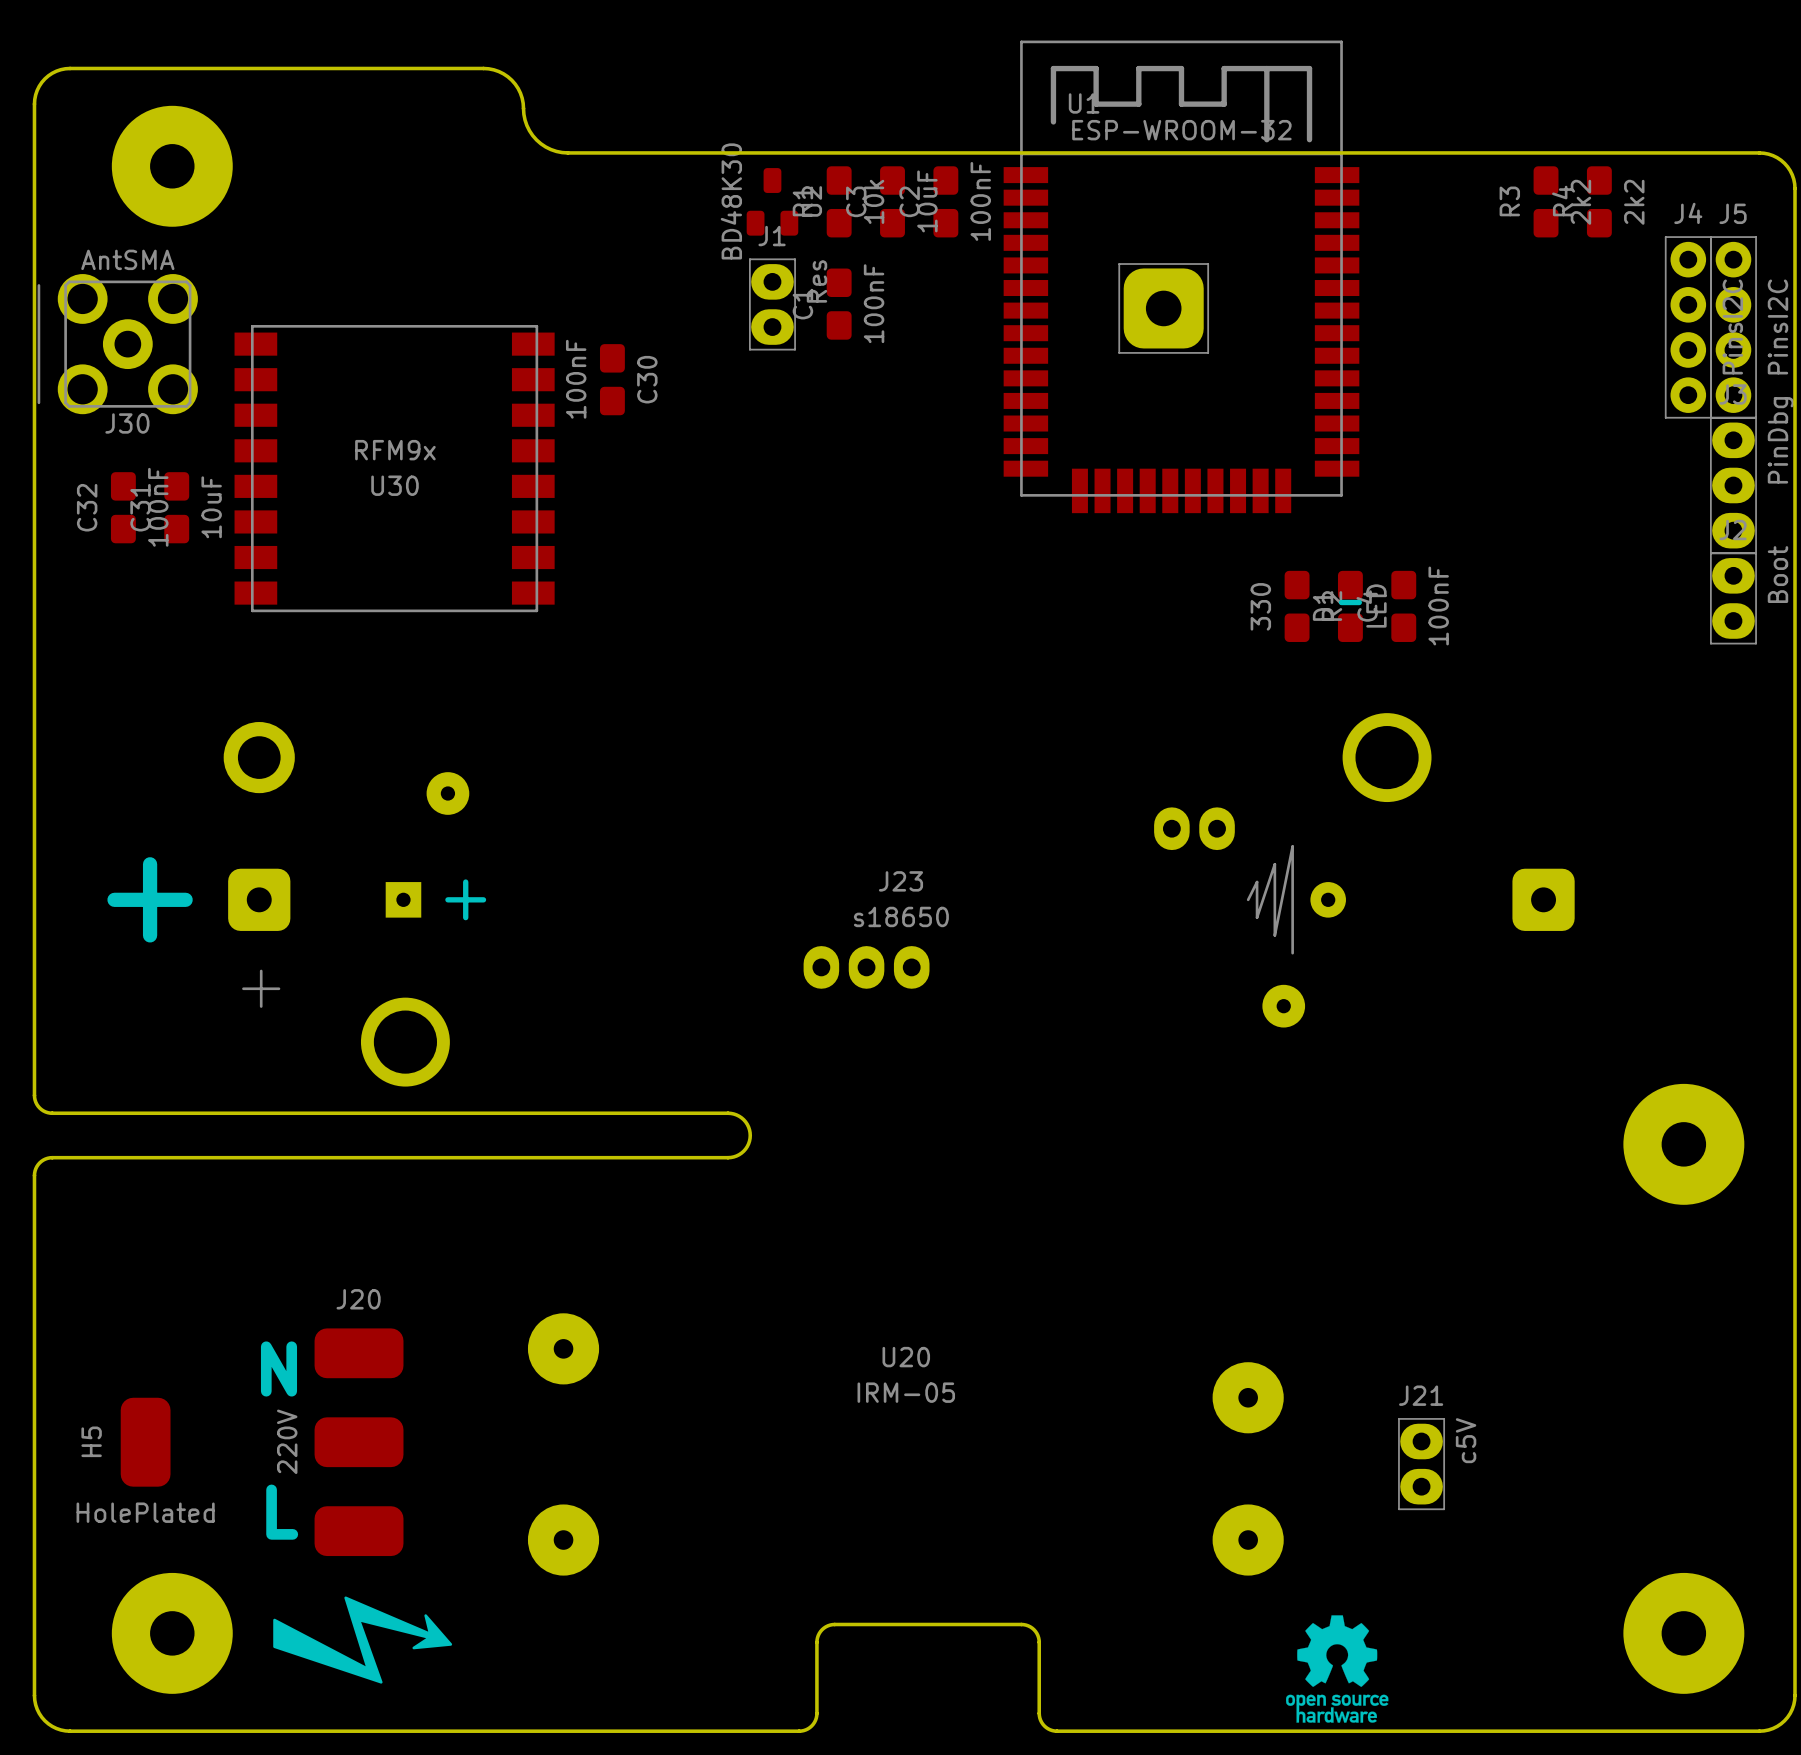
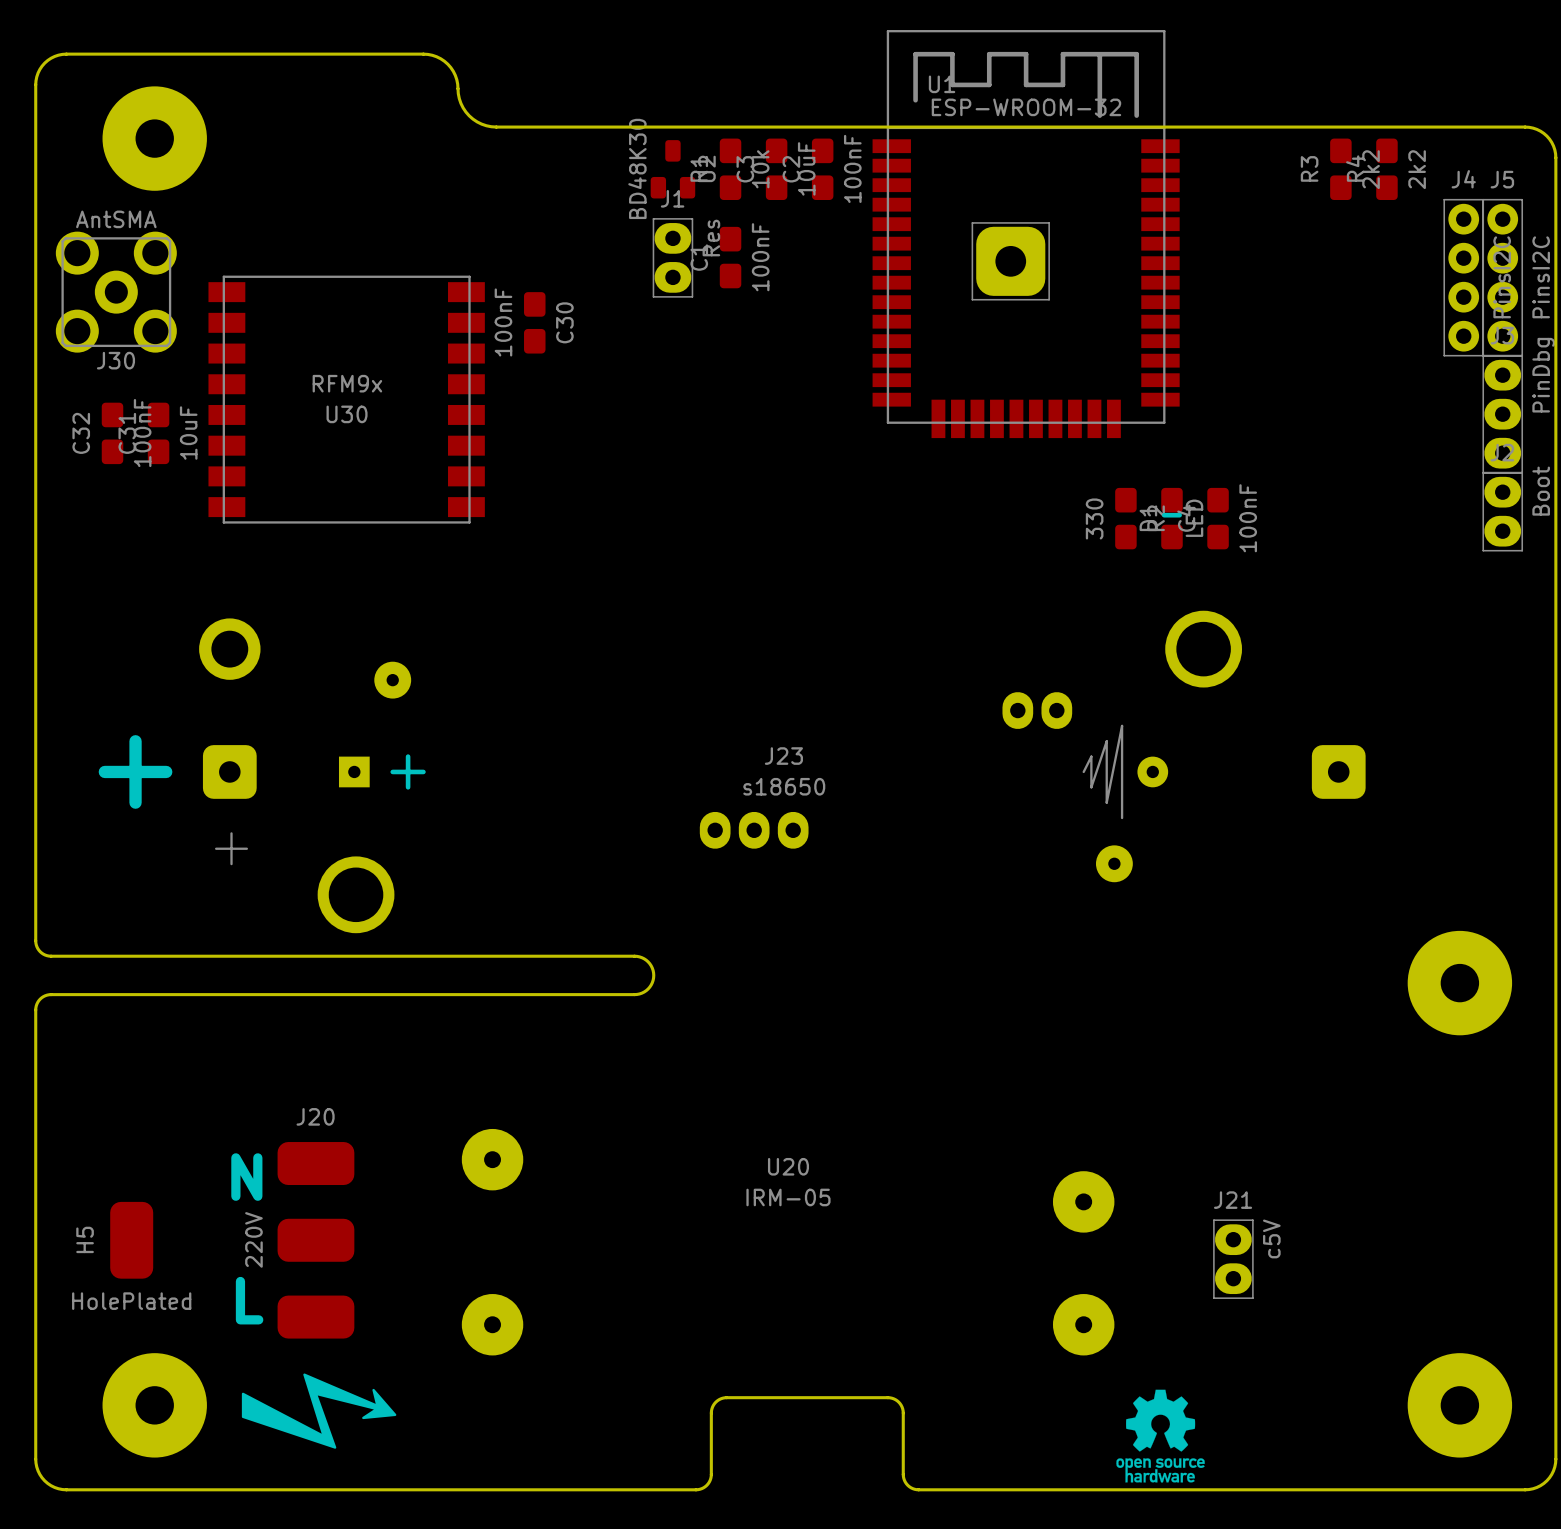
J30 footprint: [37, 274, 198, 415] -> [55, 231, 177, 353]

